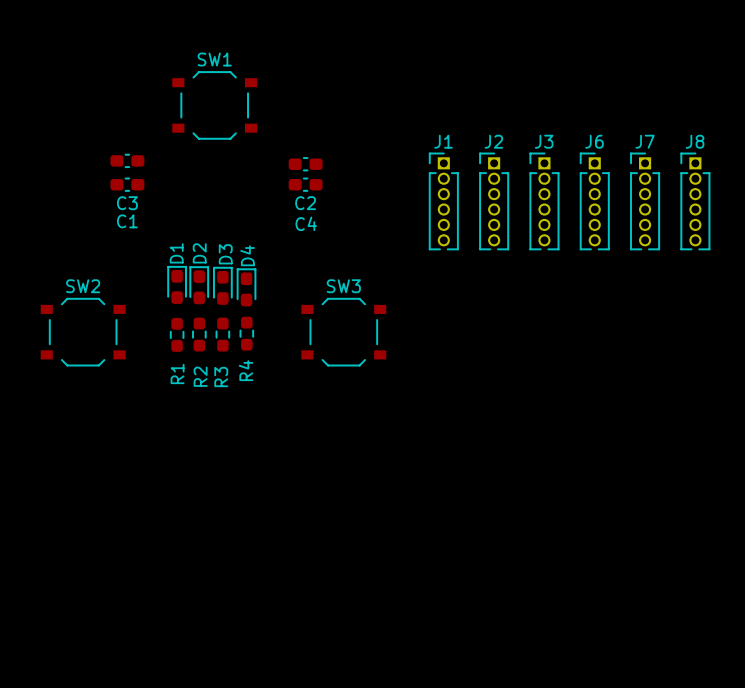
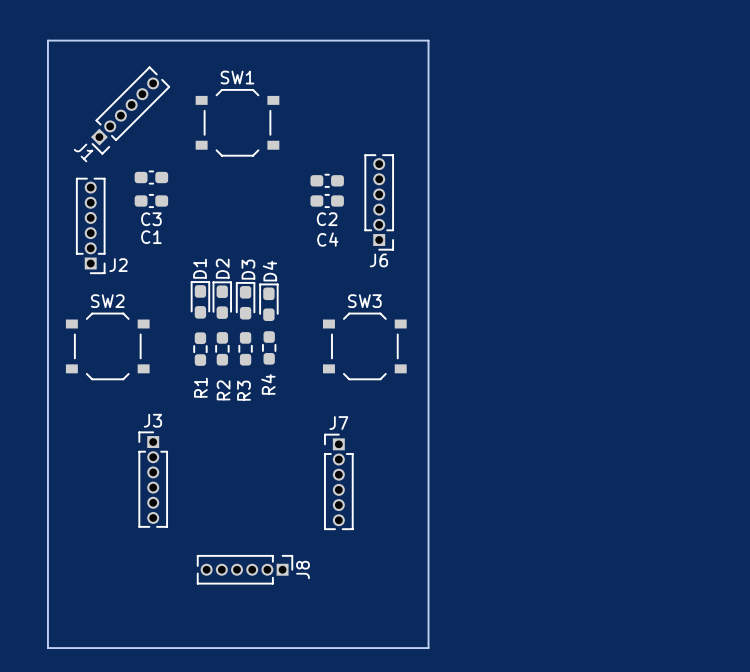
board edge: none -> (47, 40) (47, 648) (428, 648) (428, 40) (47, 40)
J2 name position: J2 (493, 141) -> J2 (118, 265)
J1 rotation: 0° (443, 201) -> 135° counterclockwise (130, 110)
J1 position: (443, 201) -> (130, 110)
J2 rotation: 0° (494, 201) -> 180° (90, 225)
J2 position: (494, 201) -> (90, 225)
J3 position: (544, 201) -> (153, 479)
J6 rotation: 0° (594, 201) -> 180° (379, 202)
J6 position: (594, 201) -> (379, 202)
J7 position: (645, 201) -> (338, 481)
J8 rotation: 0° (695, 201) -> 90° clockwise (245, 569)
J8 position: (695, 201) -> (245, 569)

